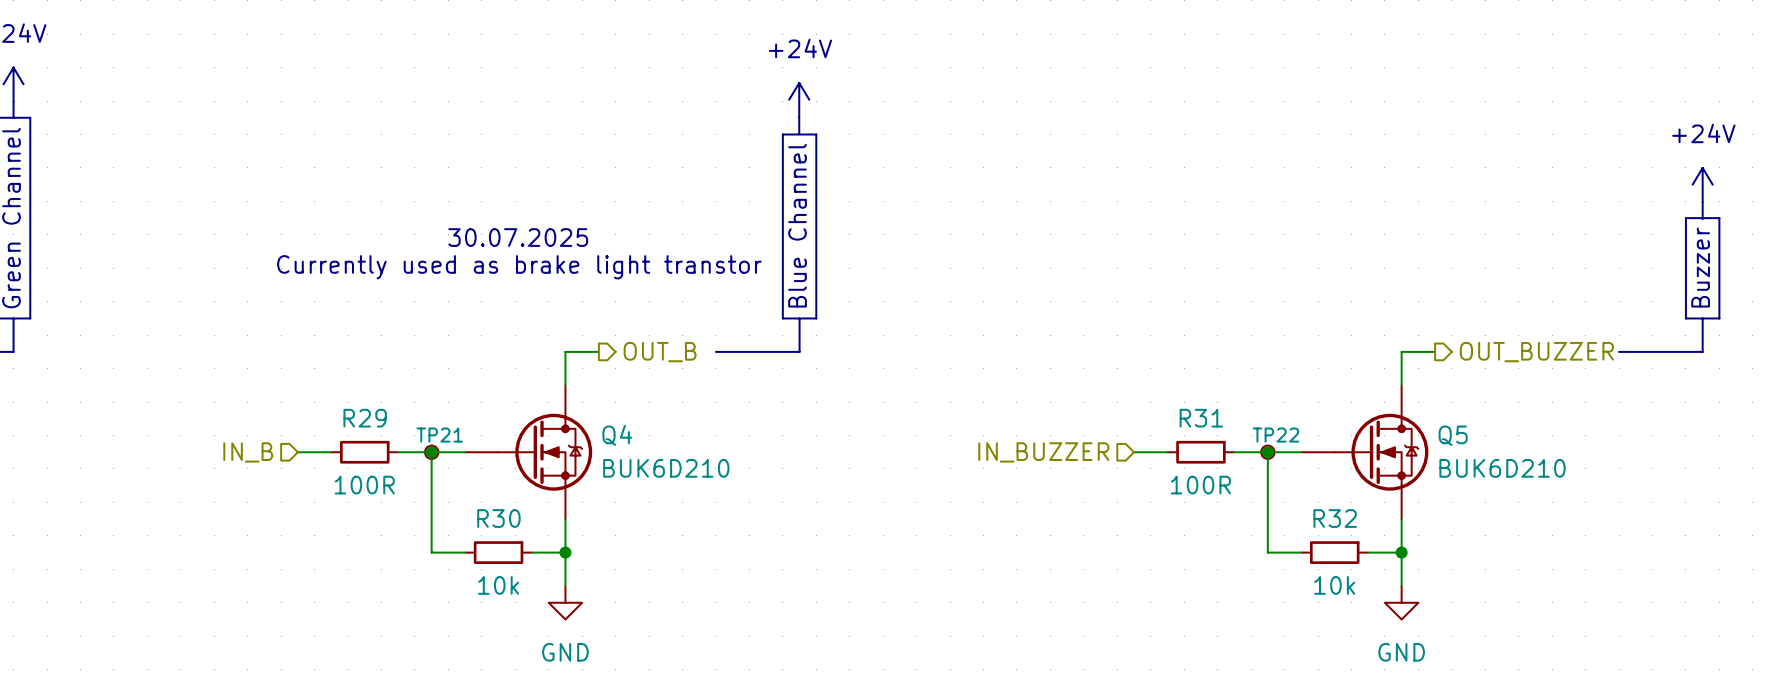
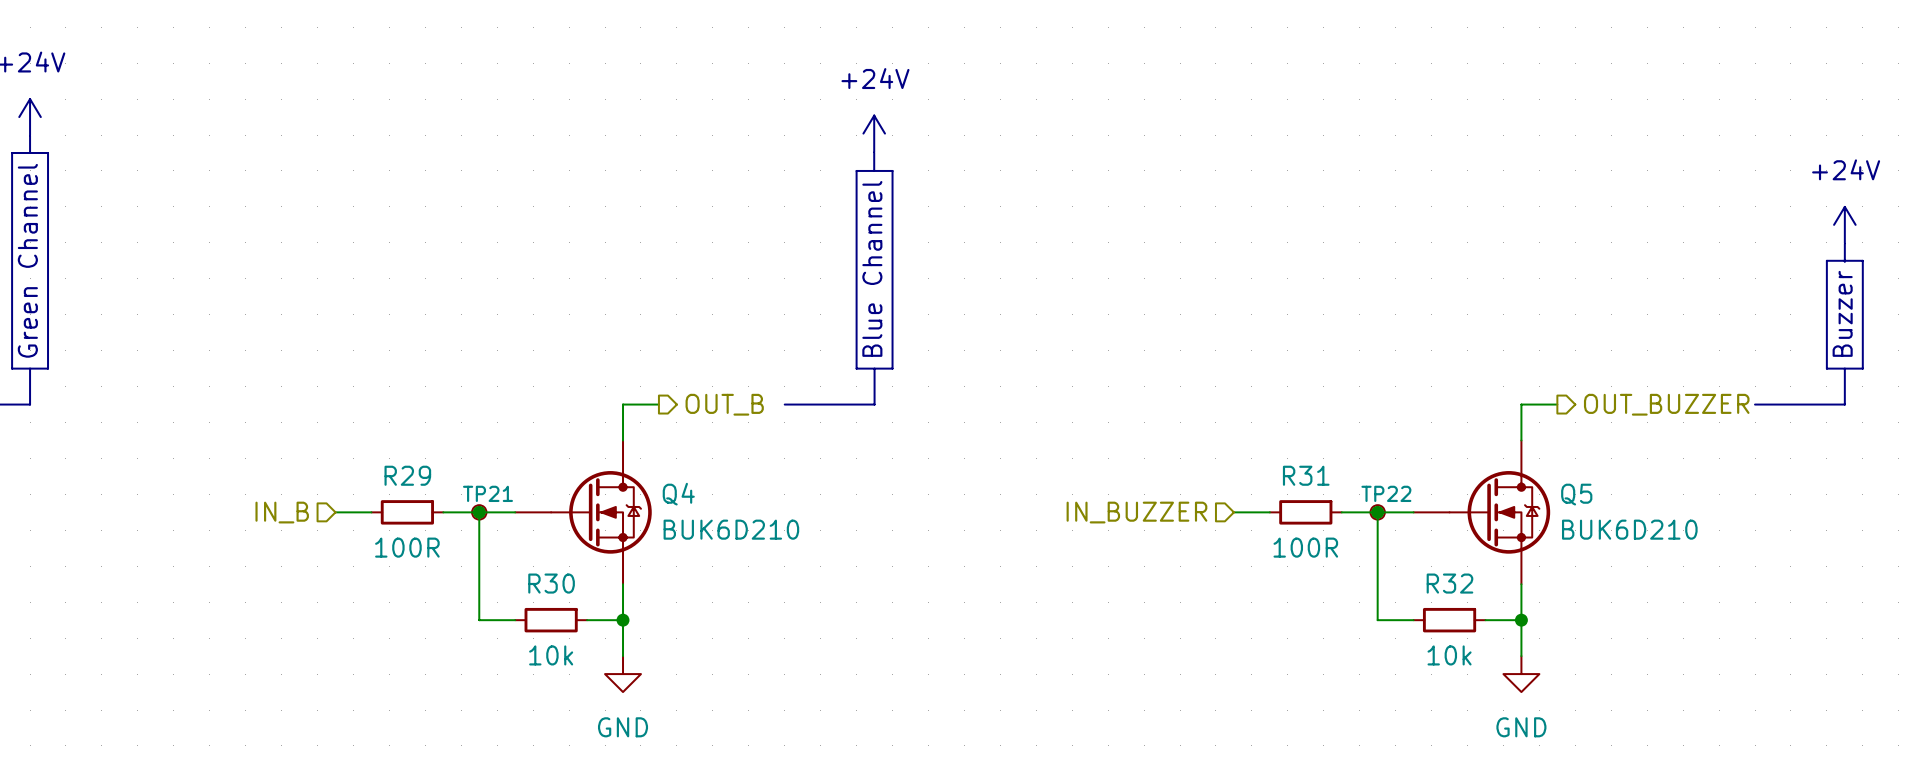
text: 30.07.2025 (518, 237) -> none
text: Currently used as brake light transtor (519, 267) -> none

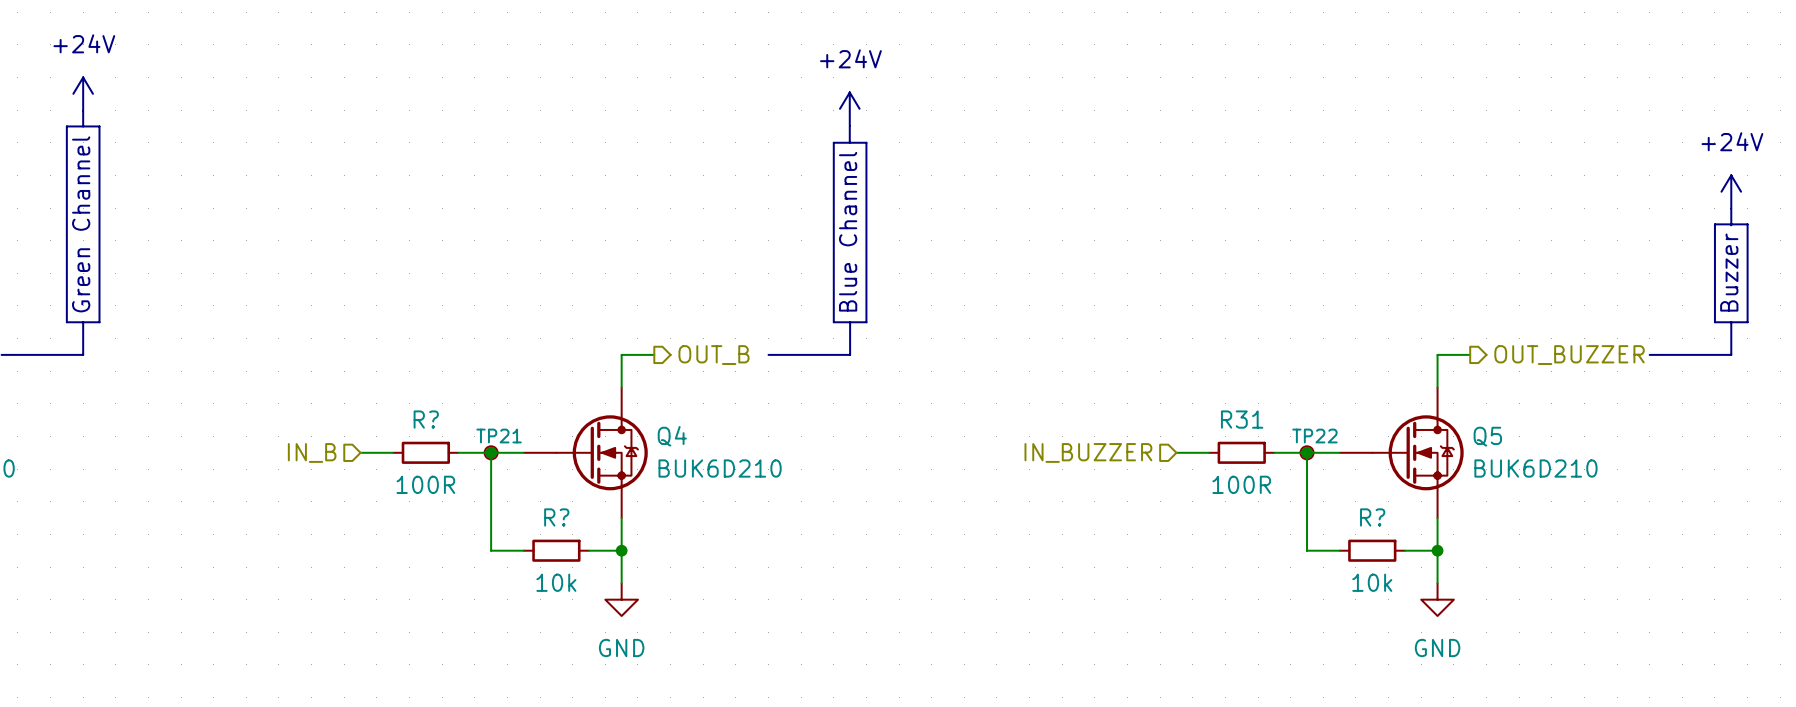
R29 name: R29 (407, 475) -> R? (426, 419)
R30 name: R30 (551, 583) -> R? (556, 517)
R32 name: R32 (1449, 583) -> R? (1372, 517)

